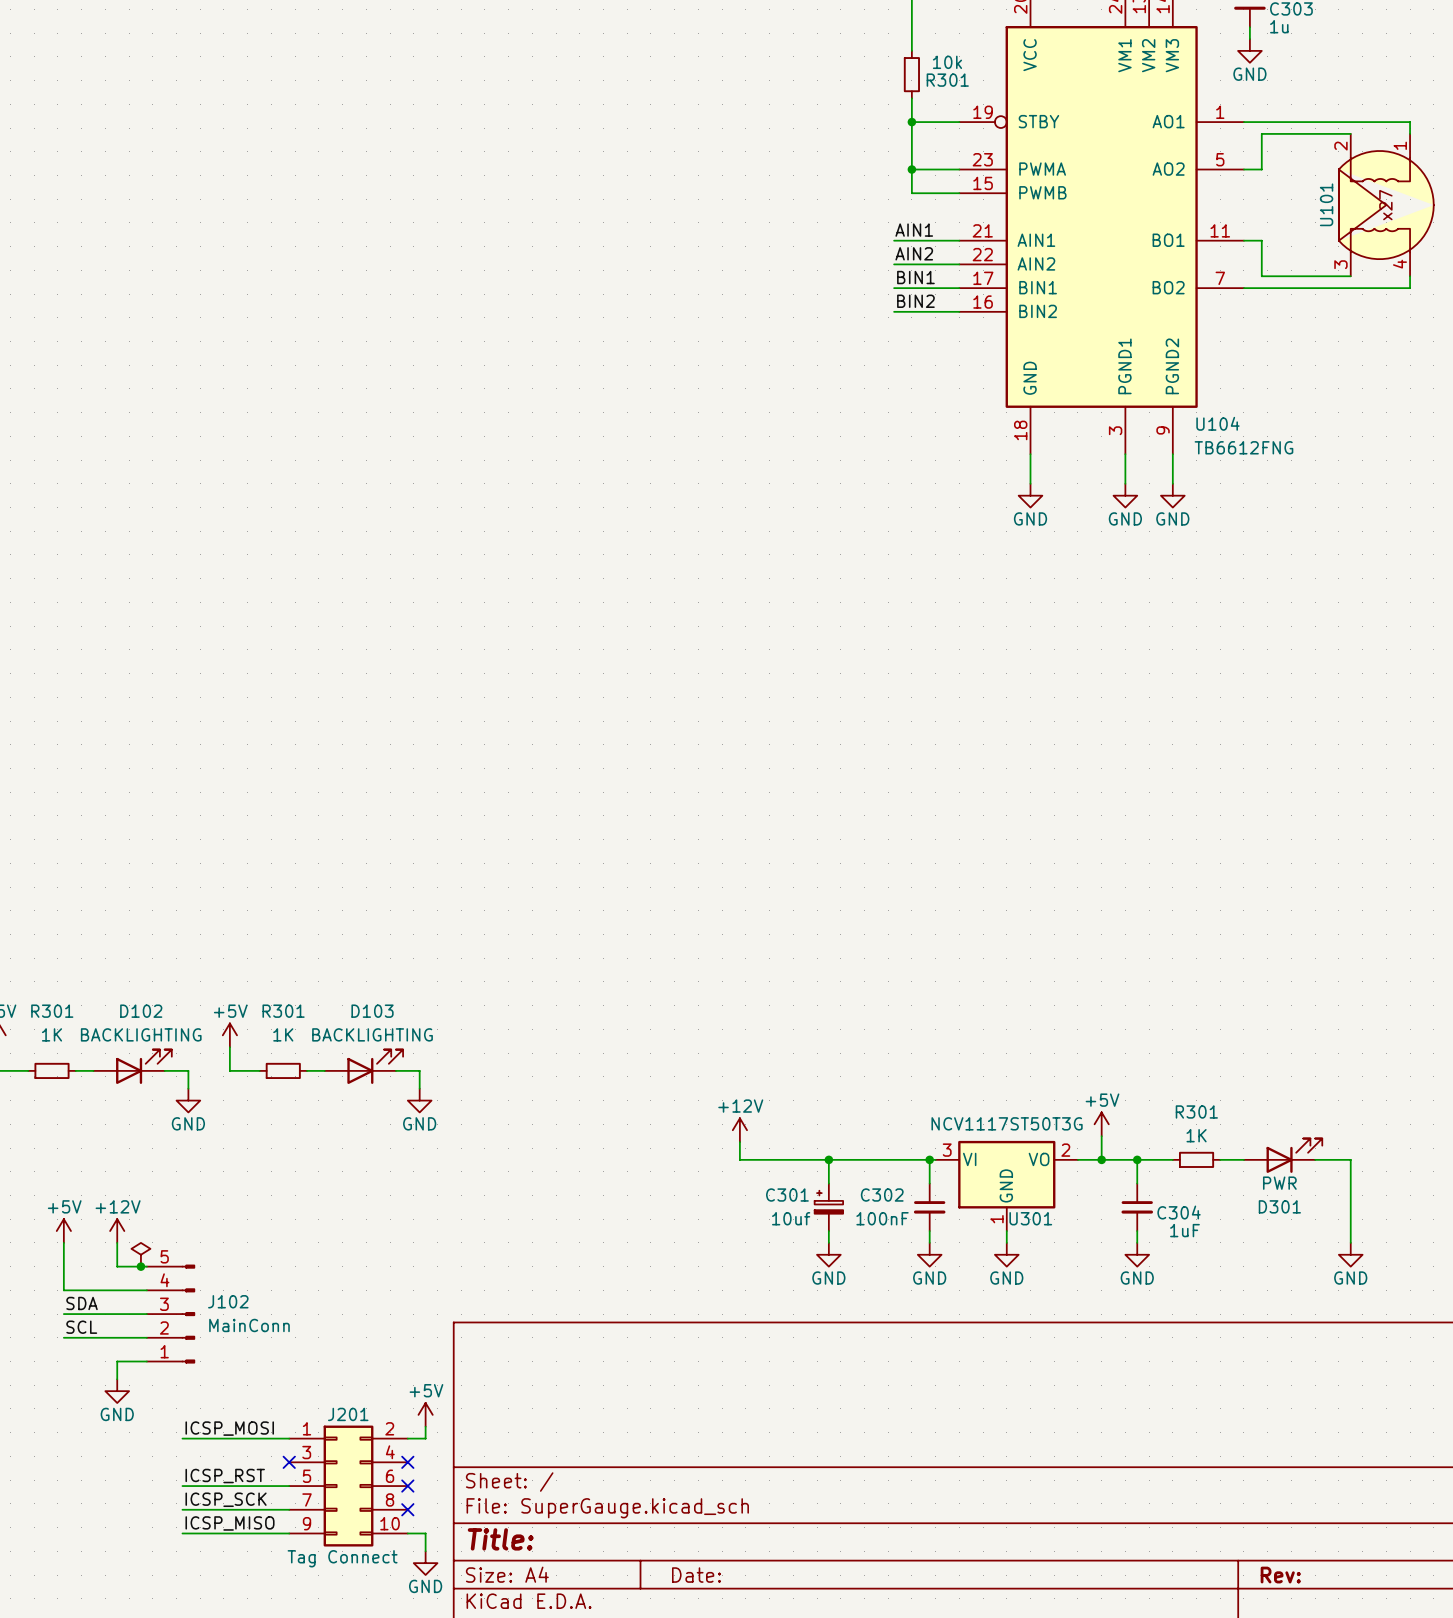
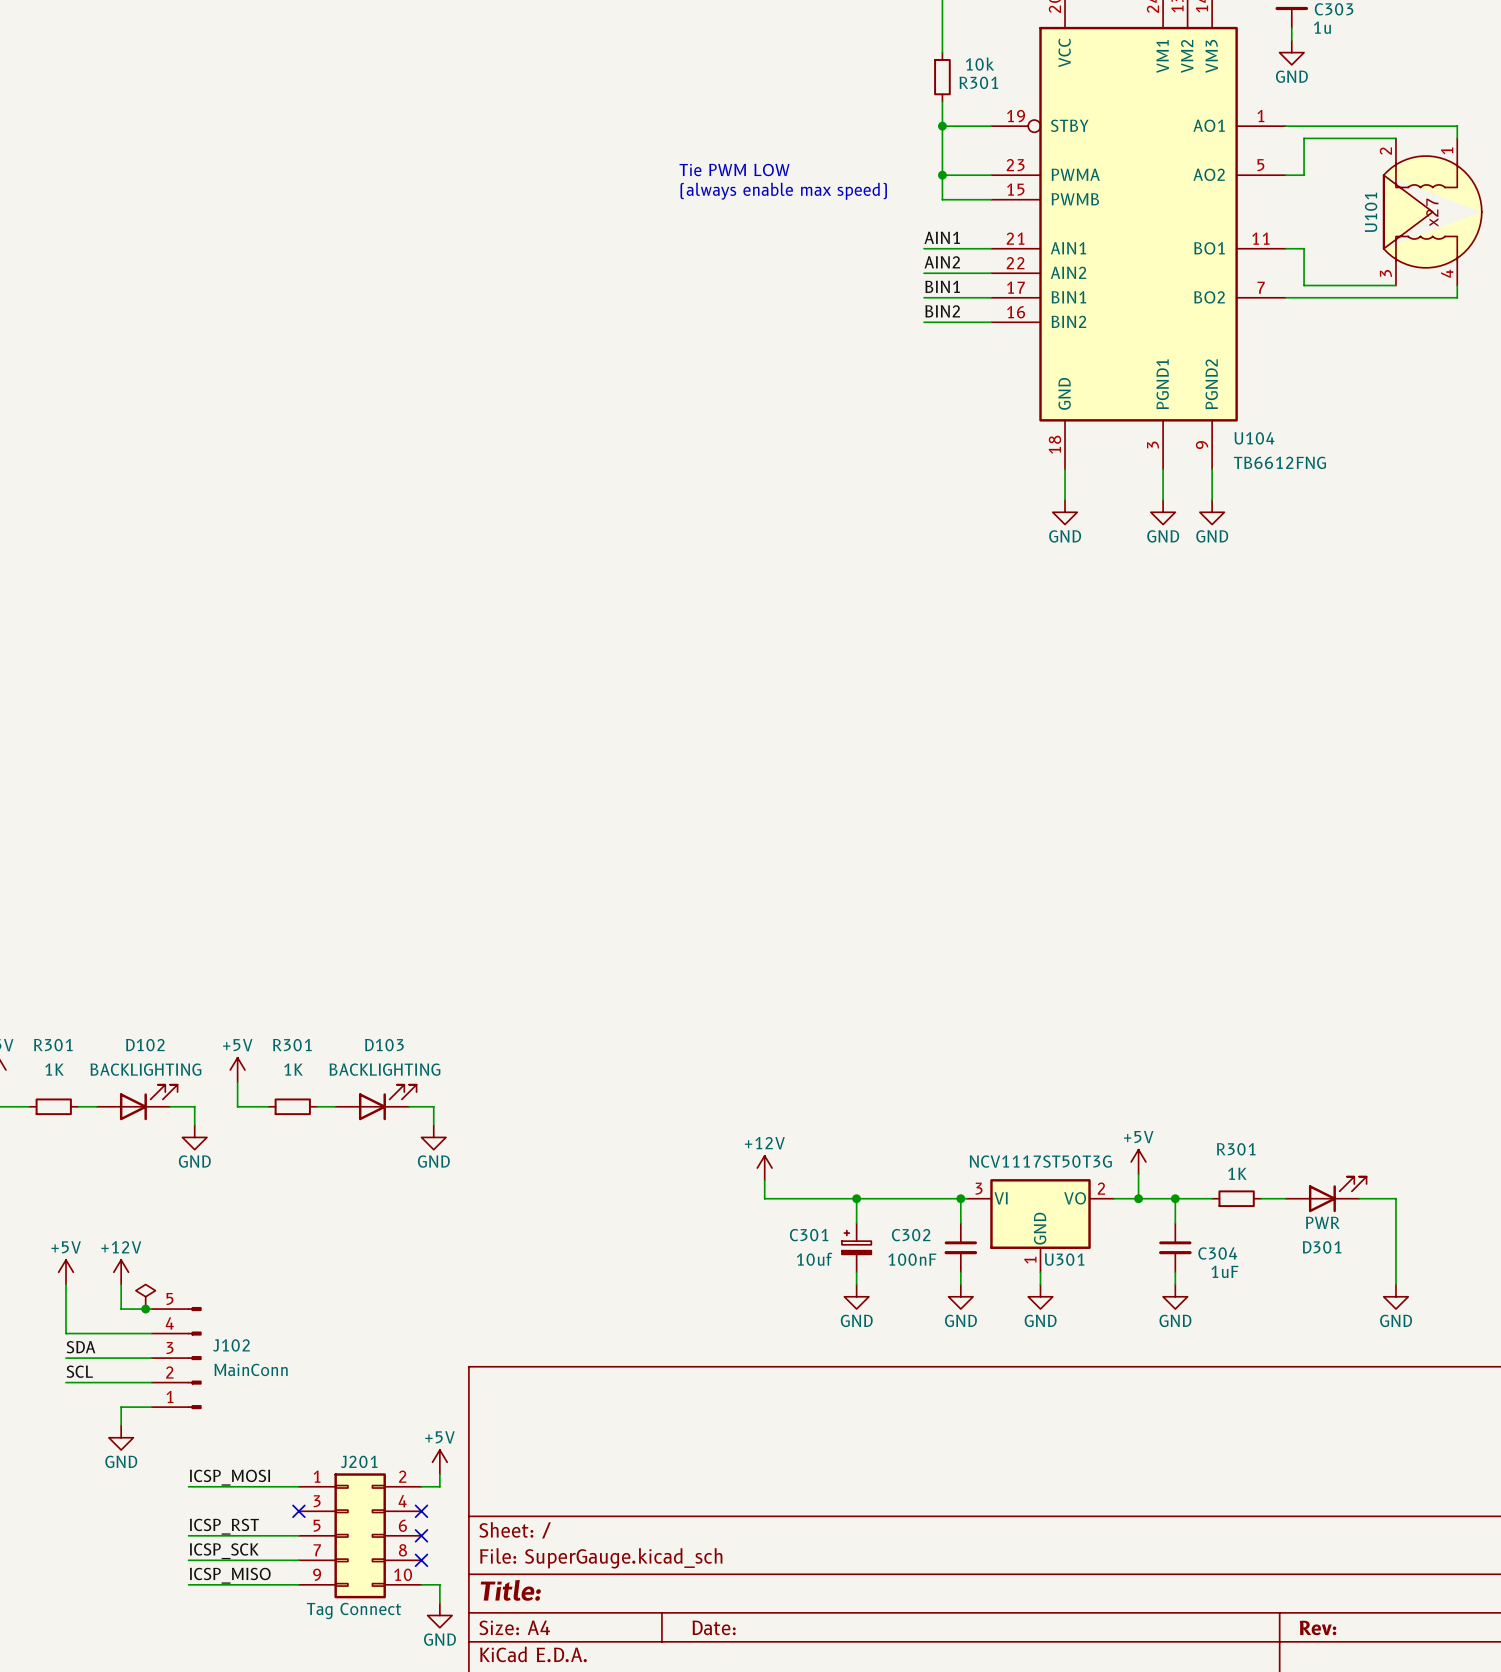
text: none -> Tie PWM LOW (734, 170)
text: none -> (always enable max speed) (783, 191)

